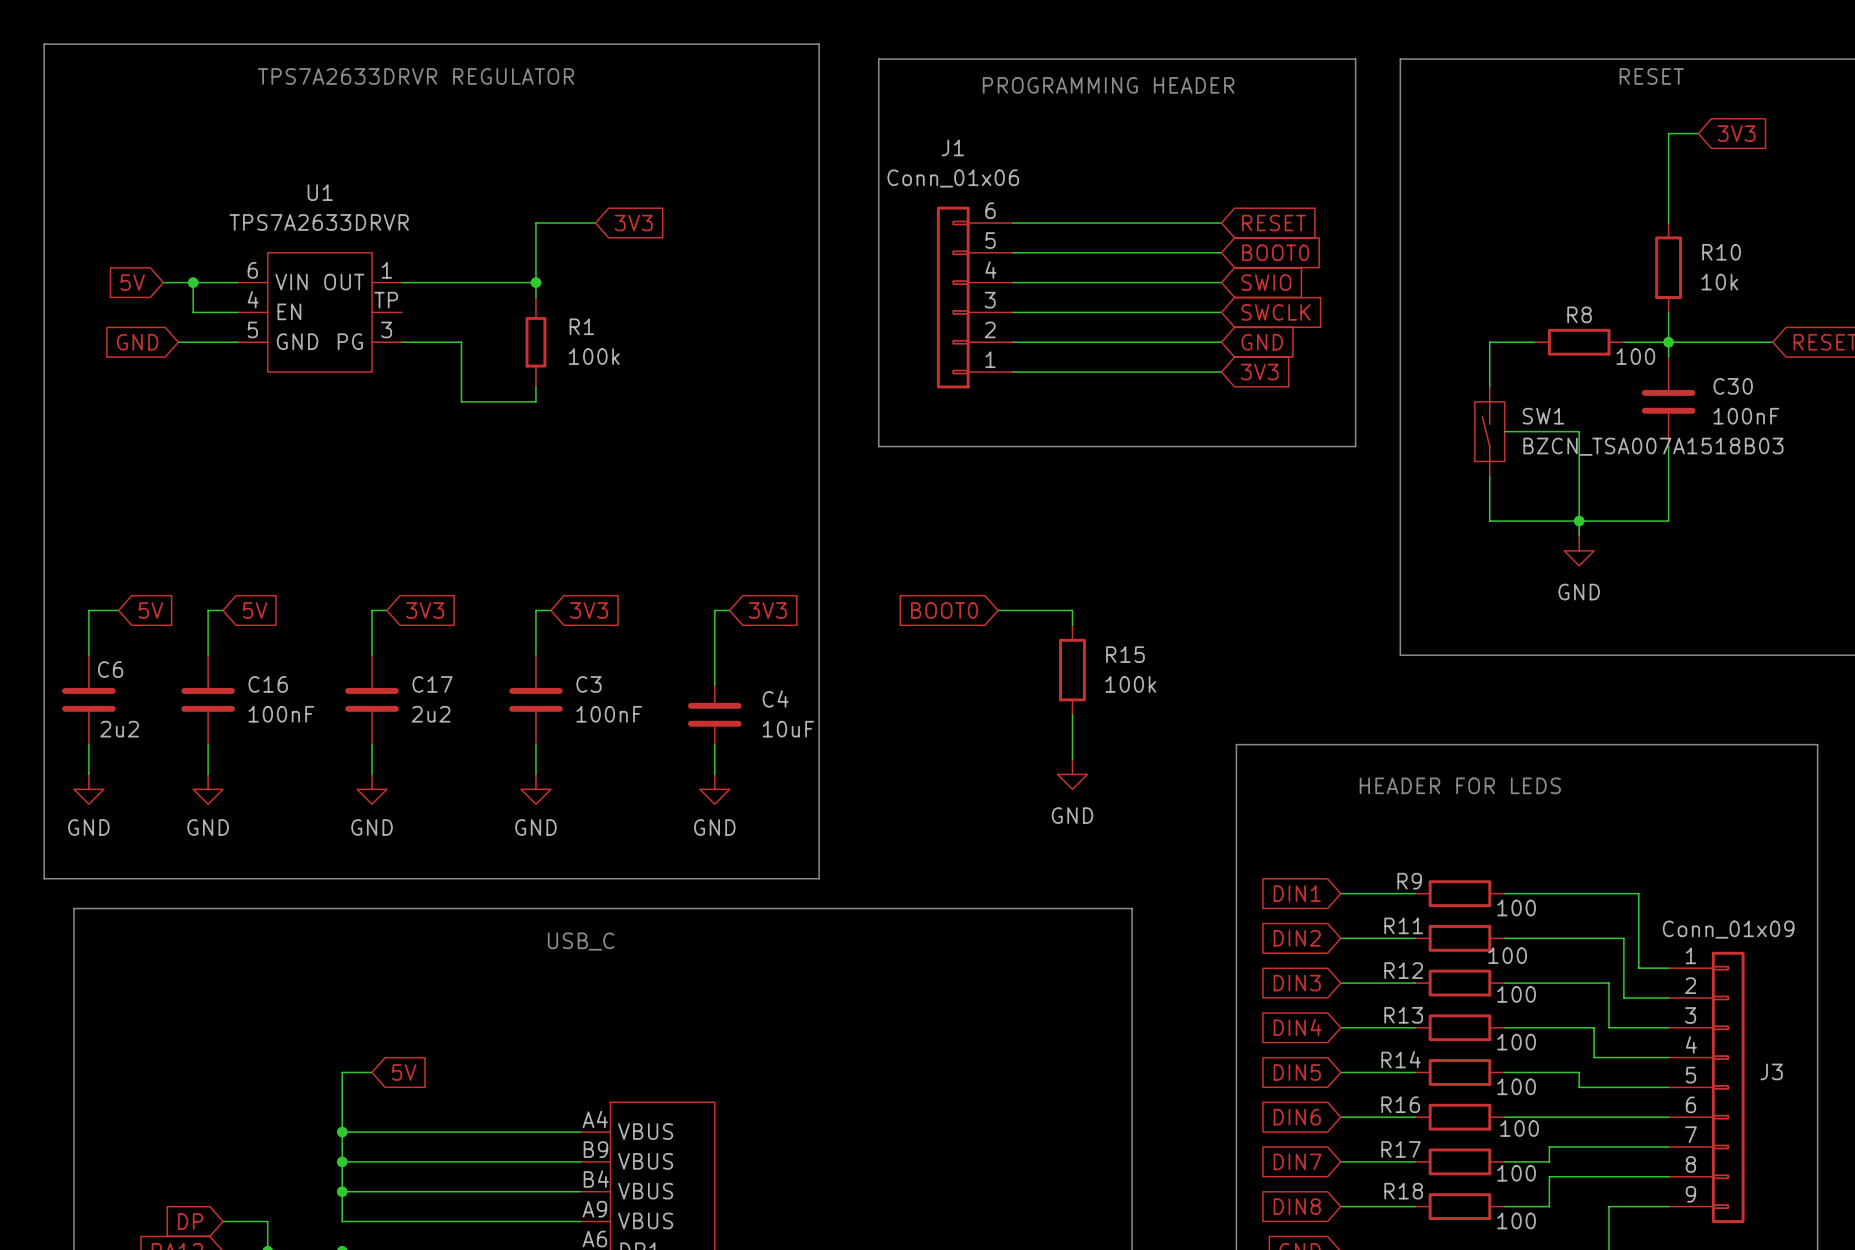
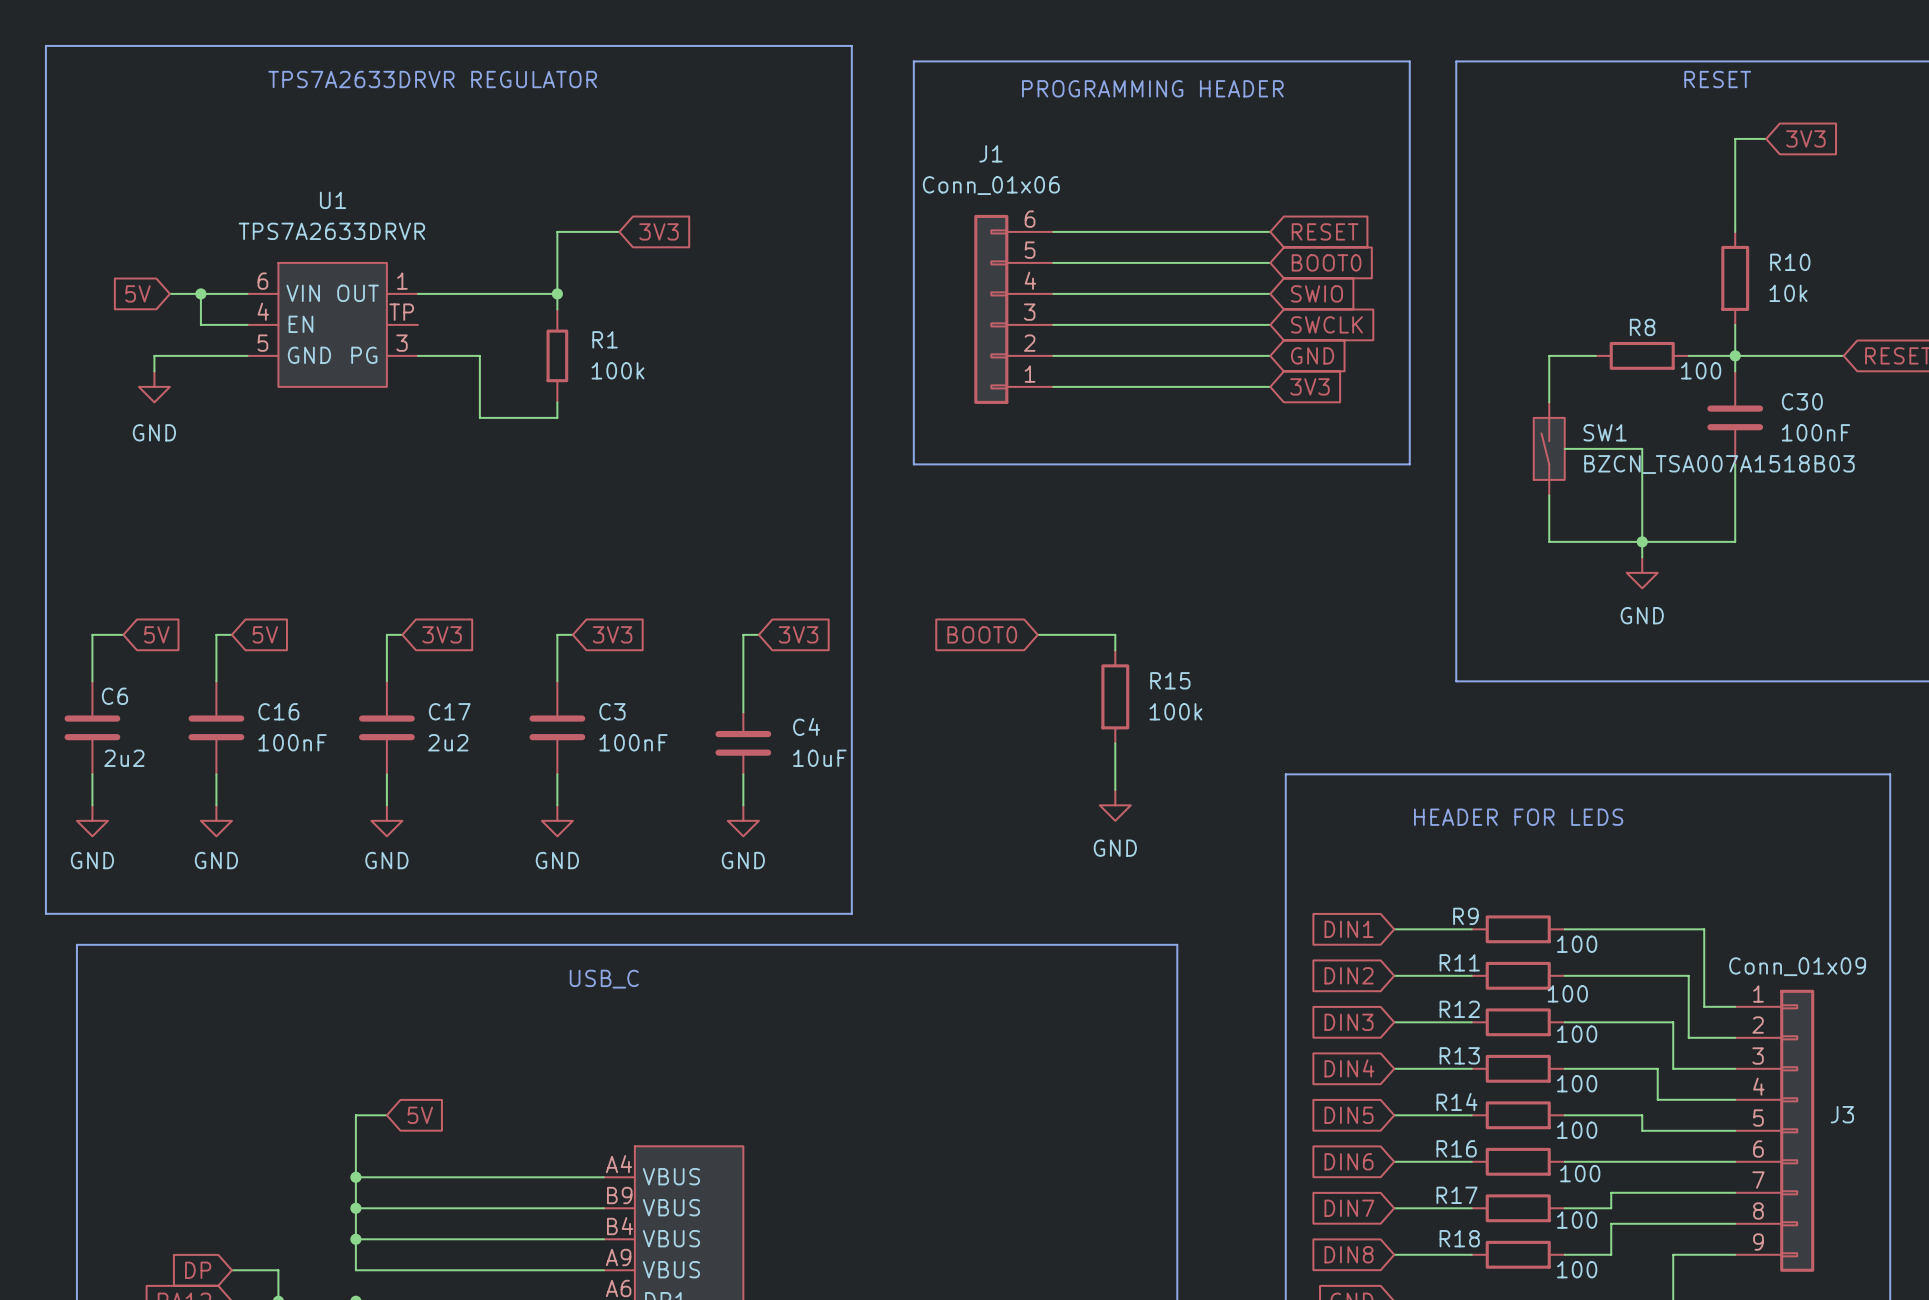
global label: GND (137, 342) -> none
wire: none -> (185, 355) (154, 355) (154, 371)
power symbol: none -> GND (154, 386)

